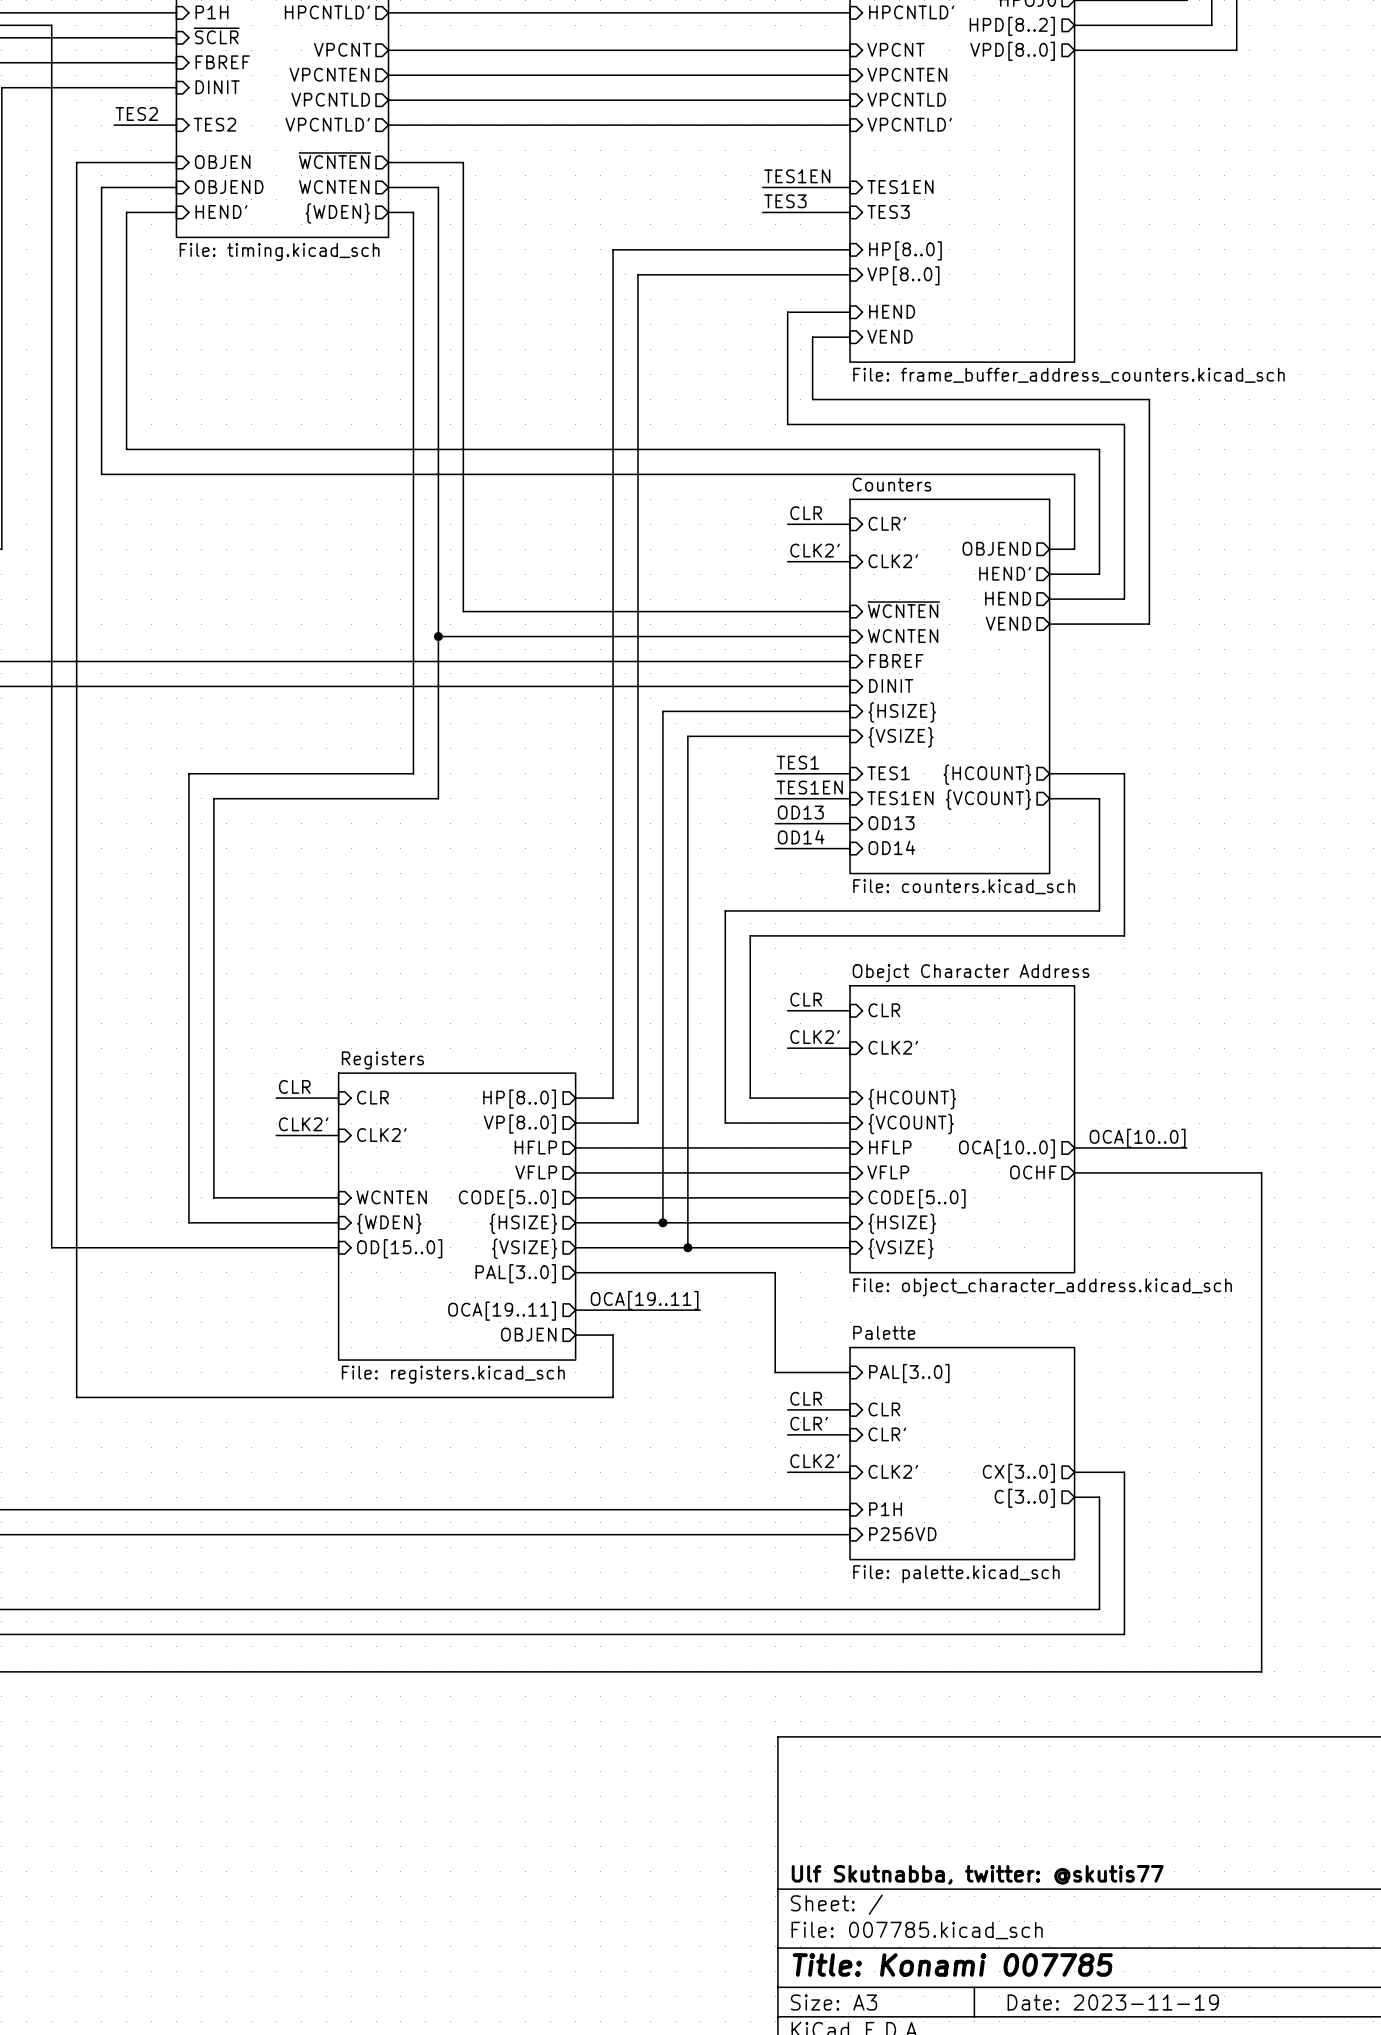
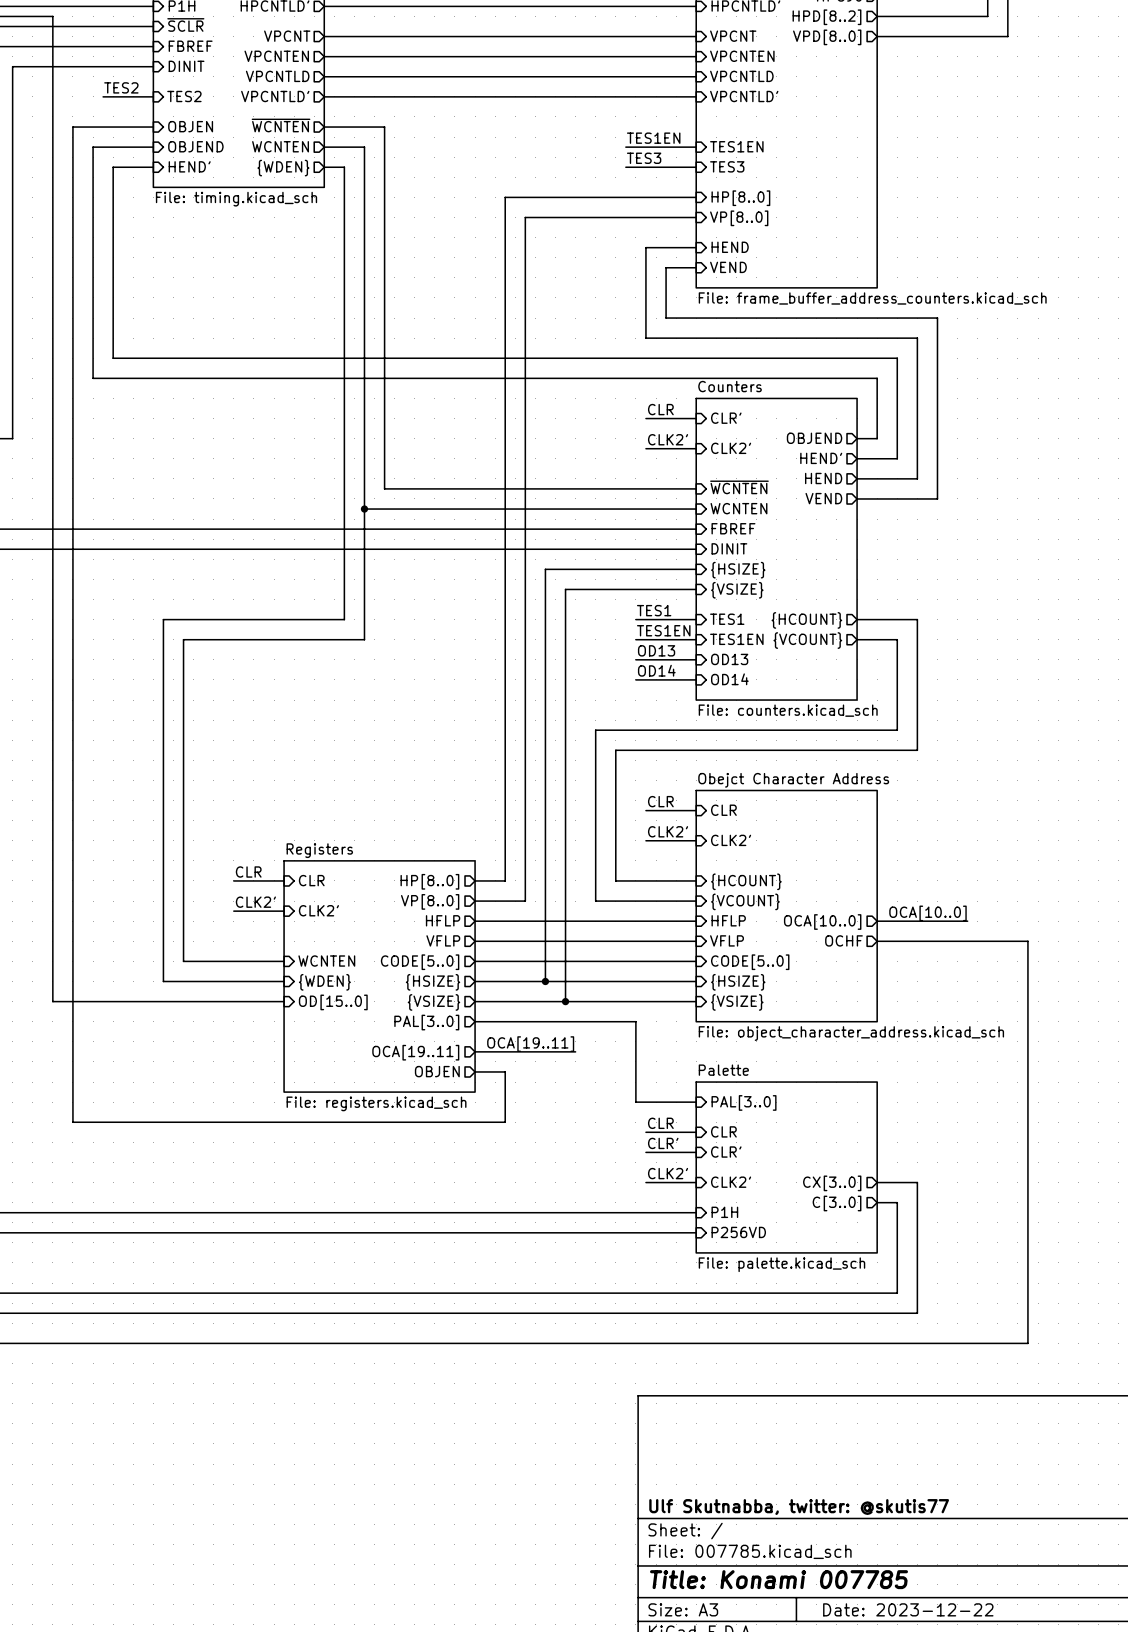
title block: Date: 2023-11-19 (1113, 2002) -> Date: 2023-12-22 (908, 1609)

